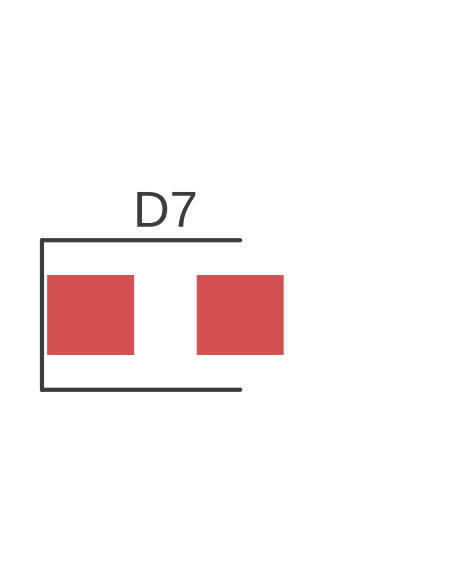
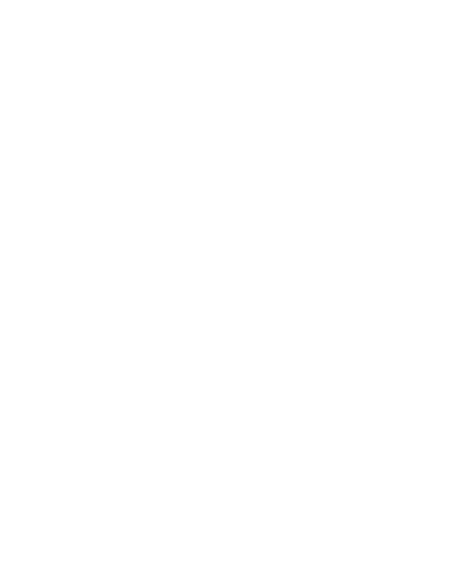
D7: (161, 315) -> none

